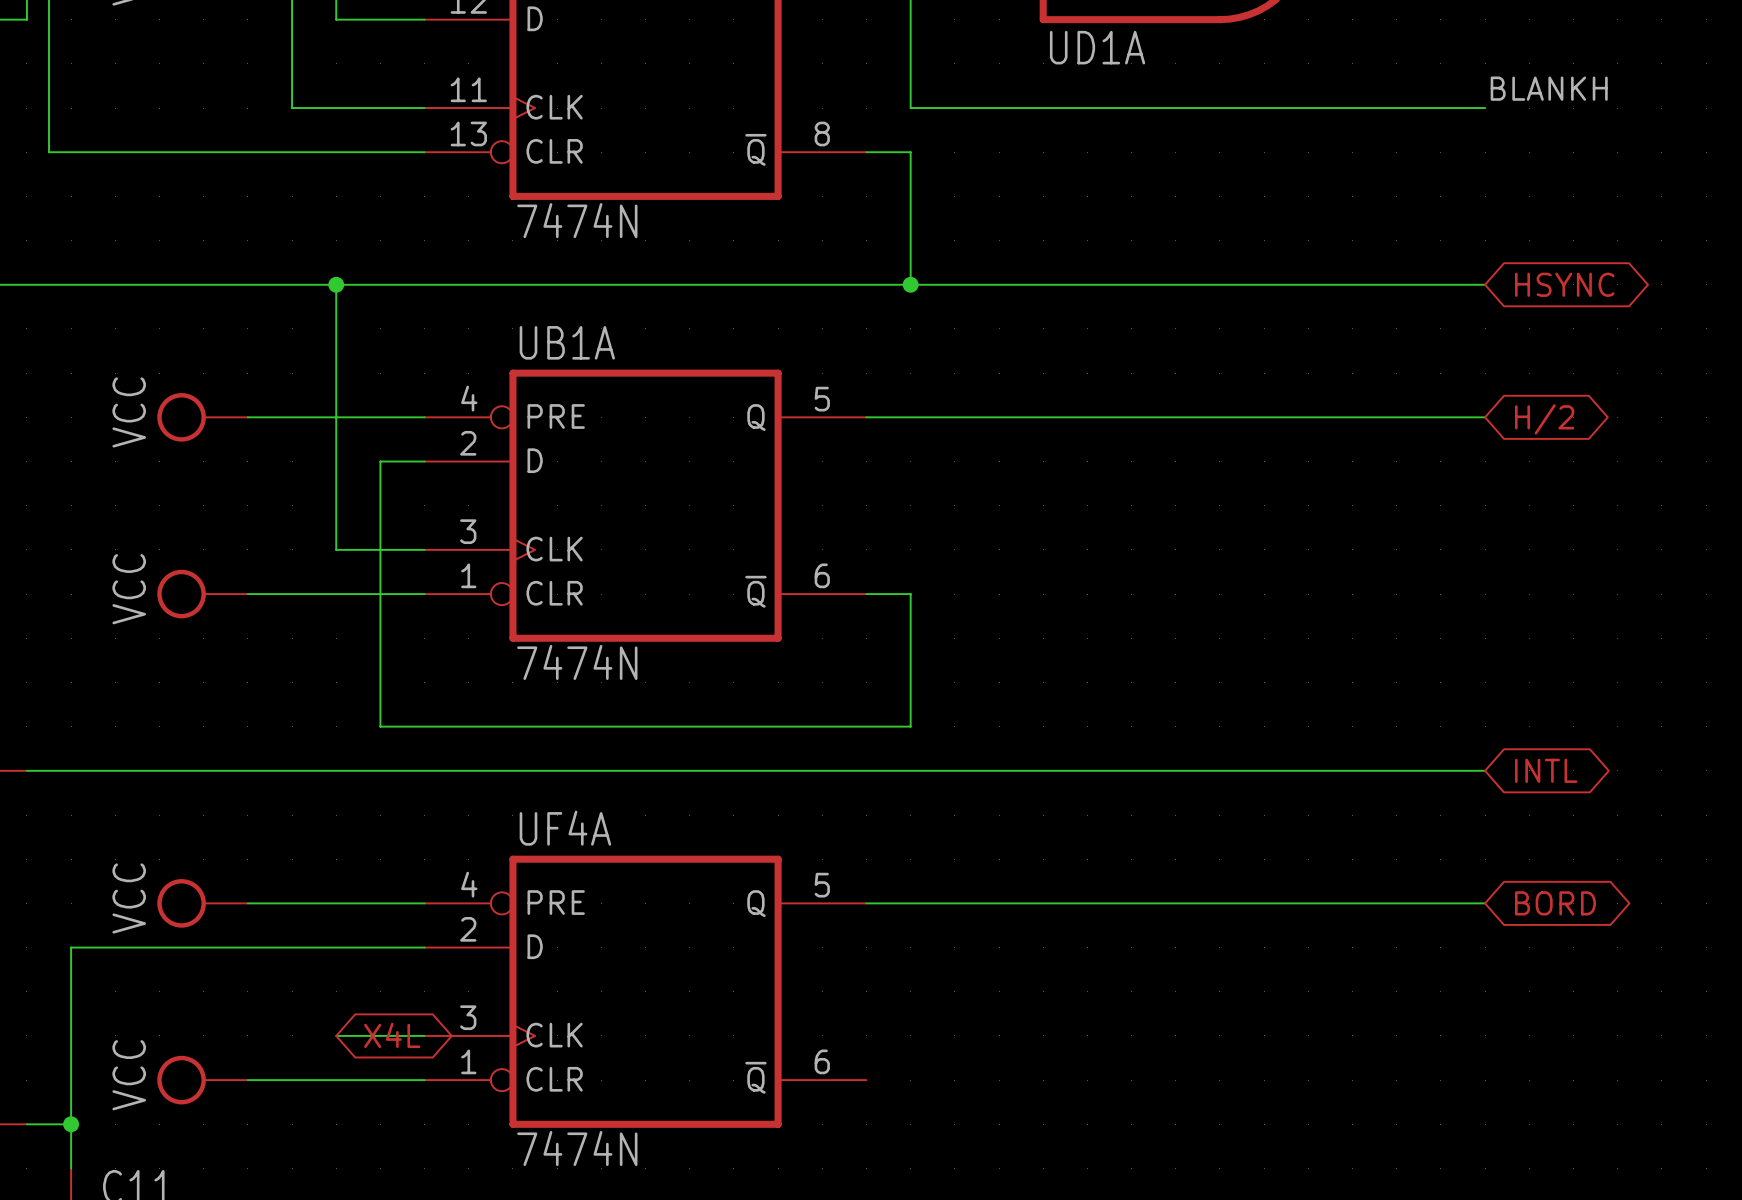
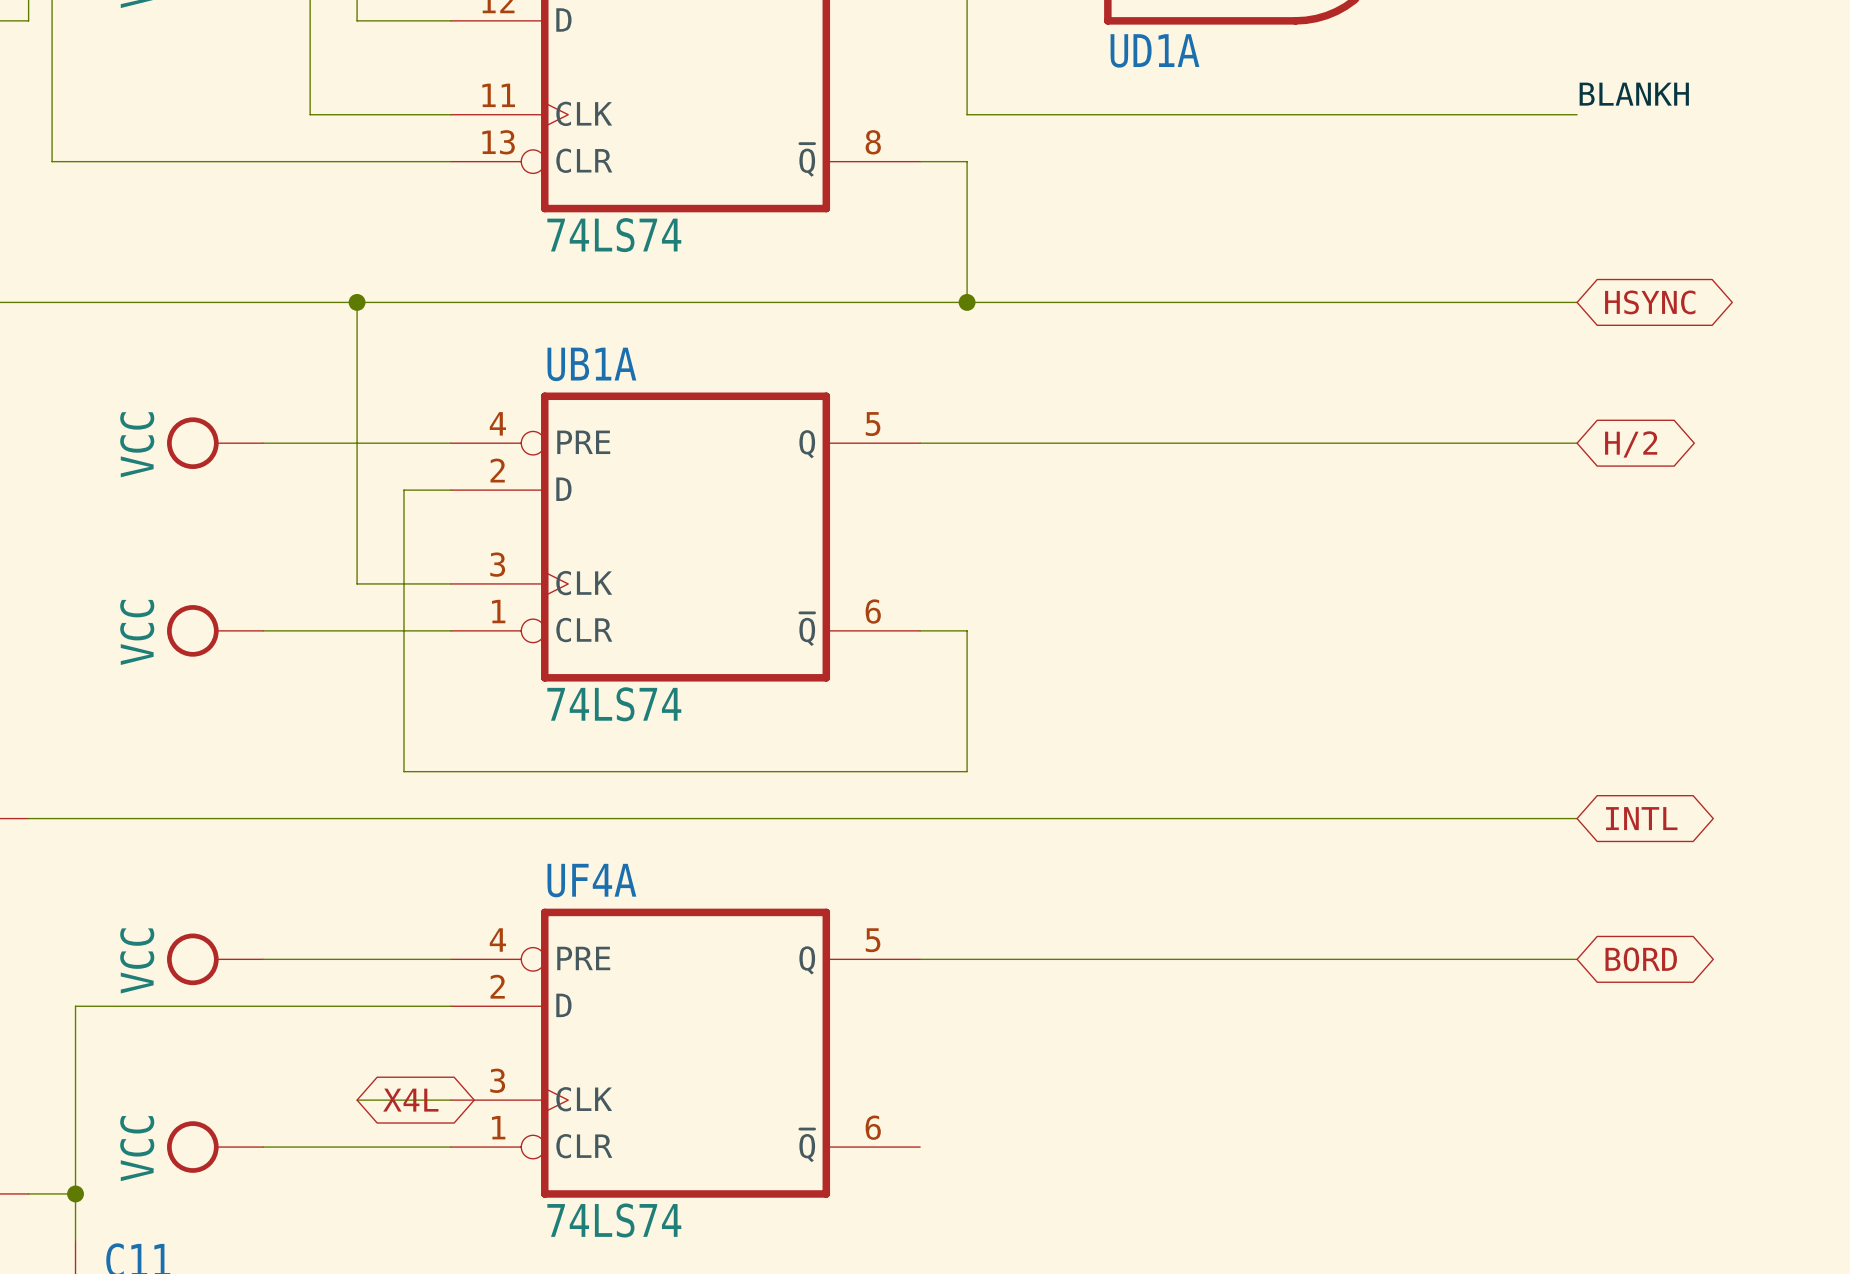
part value: 7474N (577, 220) -> 74LS74 (614, 235)
UB1A value: 7474N (577, 662) -> 74LS74 (614, 704)
UF4A value: 7474N (577, 1148) -> 74LS74 (614, 1220)

